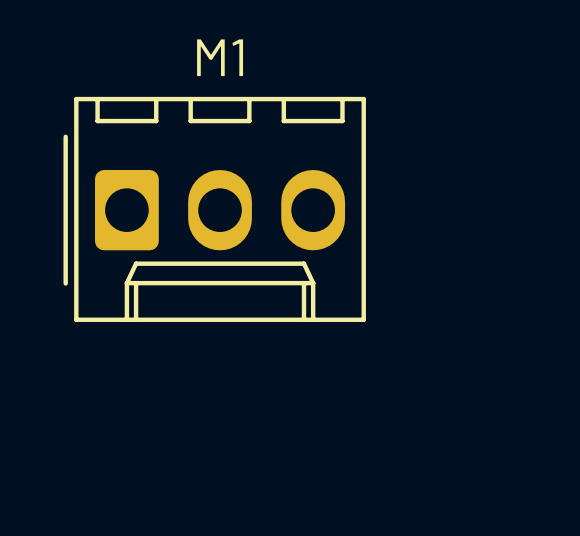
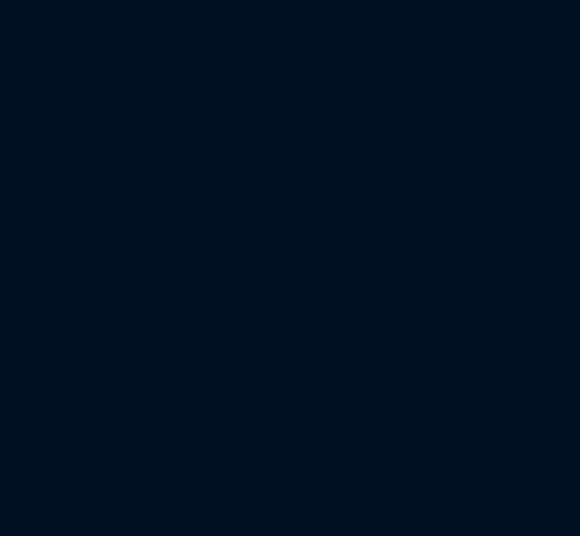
M1: (214, 209) -> none

